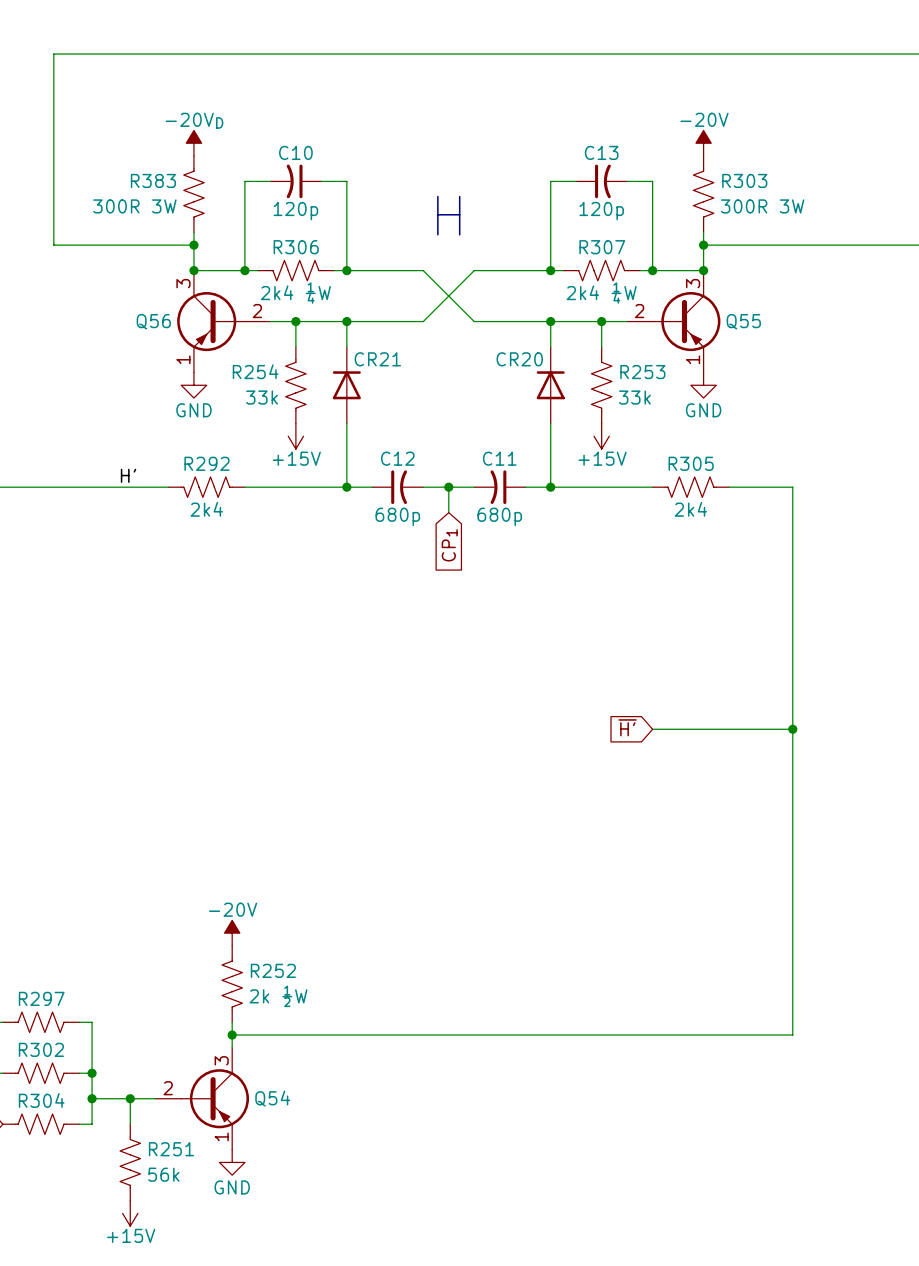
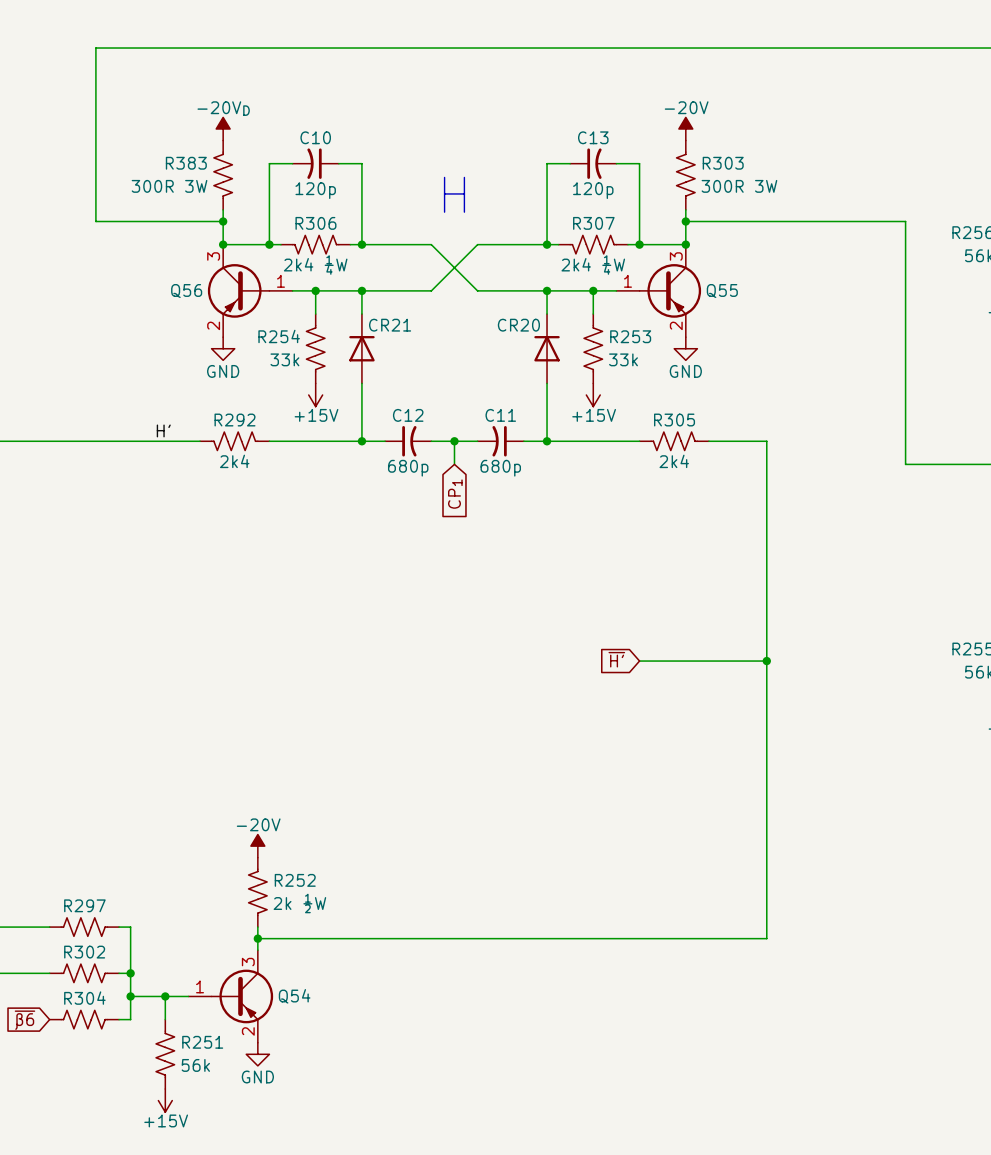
Q56 pin number: 2 (257, 311) -> 1 (280, 281)
Q55 pin number: 2 (639, 311) -> 1 (627, 281)
Q56 pin number: 1 (183, 359) -> 2 (213, 325)
Q55 pin number: 1 (693, 359) -> 2 (676, 325)
Q54 pin number: 2 (168, 1088) -> 1 (200, 986)
Q54 pin number: 1 (221, 1136) -> 2 (248, 1031)

